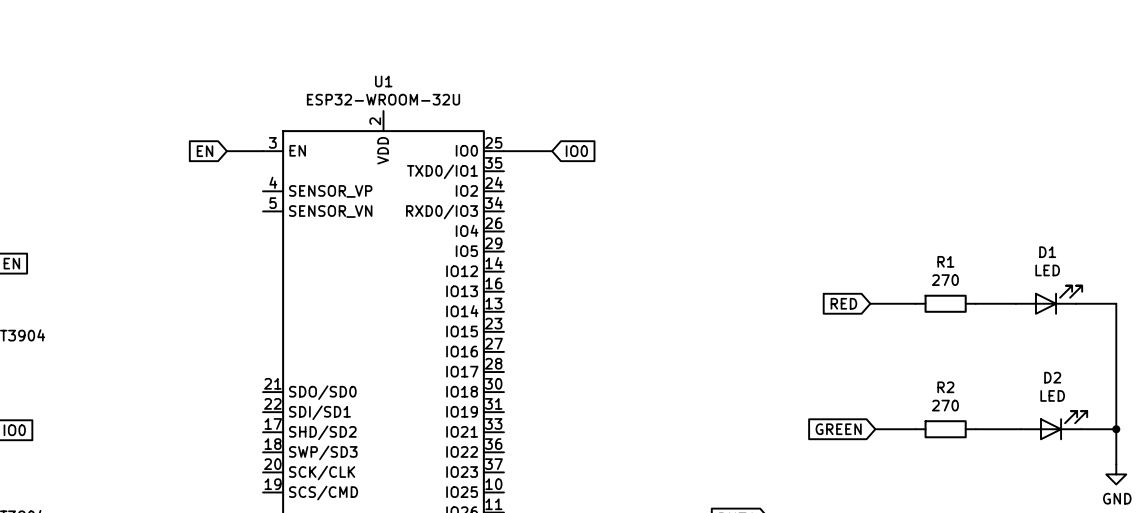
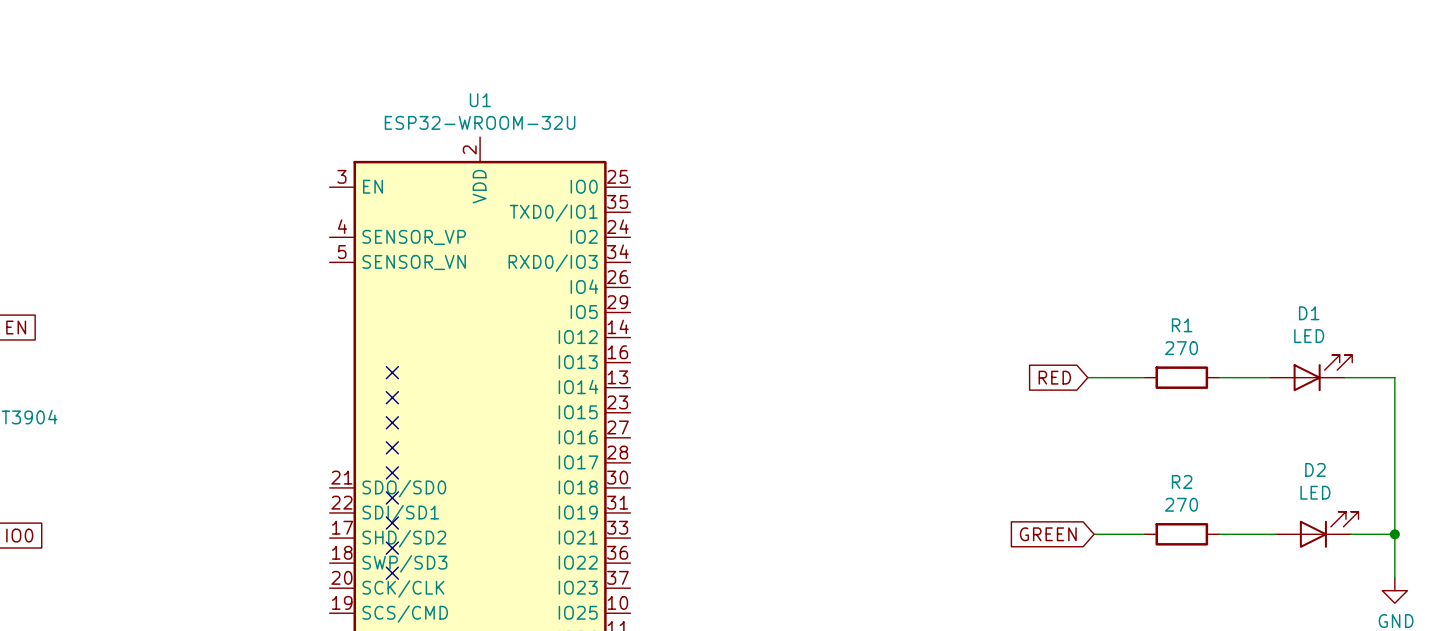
global label: EN (205, 151) -> none
wire: (226, 151) (263, 151) -> none
wire: (503, 151) (552, 151) -> none
global label: IO0 (576, 151) -> none
no-connect mark: none -> (392, 372)
no-connect mark: none -> (392, 397)
no-connect mark: none -> (392, 422)
no-connect mark: none -> (392, 447)
no-connect mark: none -> (392, 472)
no-connect mark: none -> (392, 497)
no-connect mark: none -> (392, 523)
no-connect mark: none -> (392, 548)
no-connect mark: none -> (392, 573)

